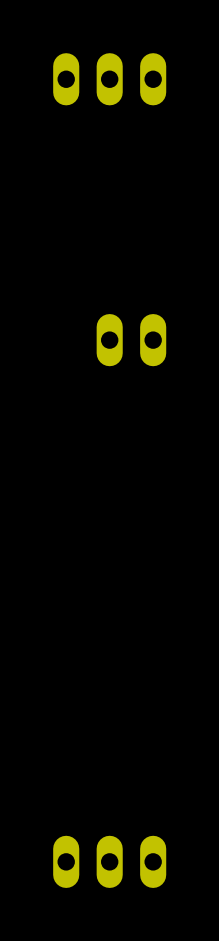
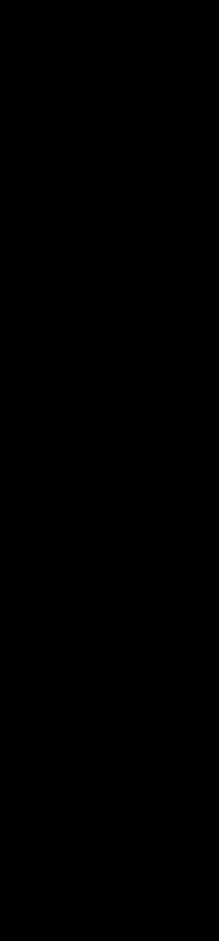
part: (109, 79) -> none
part: (131, 340) -> none
part: (109, 861) -> none

